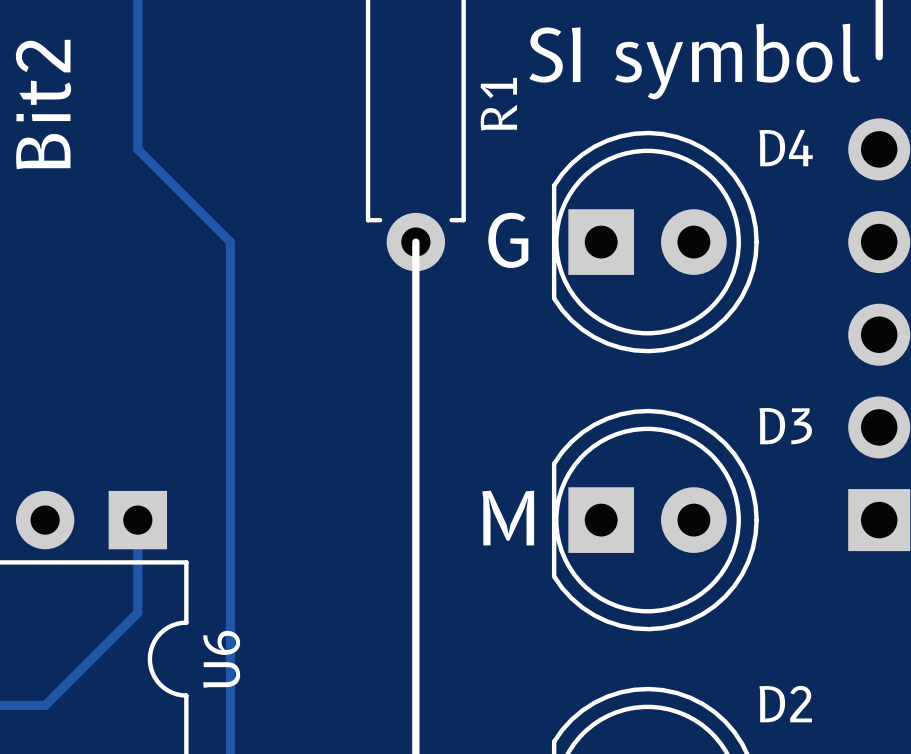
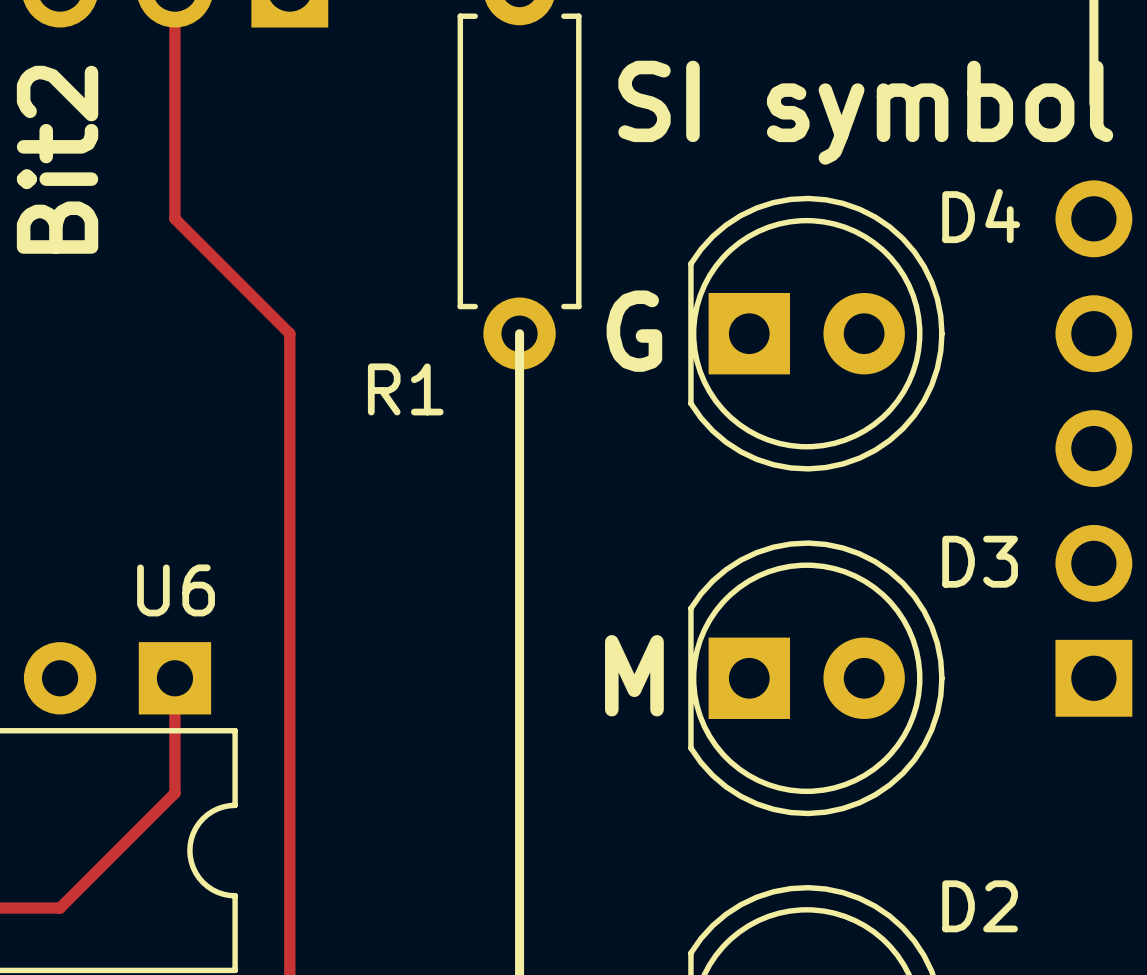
R1 name rotation: 0° (498, 104) -> 90° clockwise (405, 389)
R1 name position: R1 (498, 104) -> R1 (405, 389)
U6 name rotation: 0° (221, 659) -> 90° clockwise (176, 590)
U6 name position: U6 (221, 659) -> U6 (176, 590)

